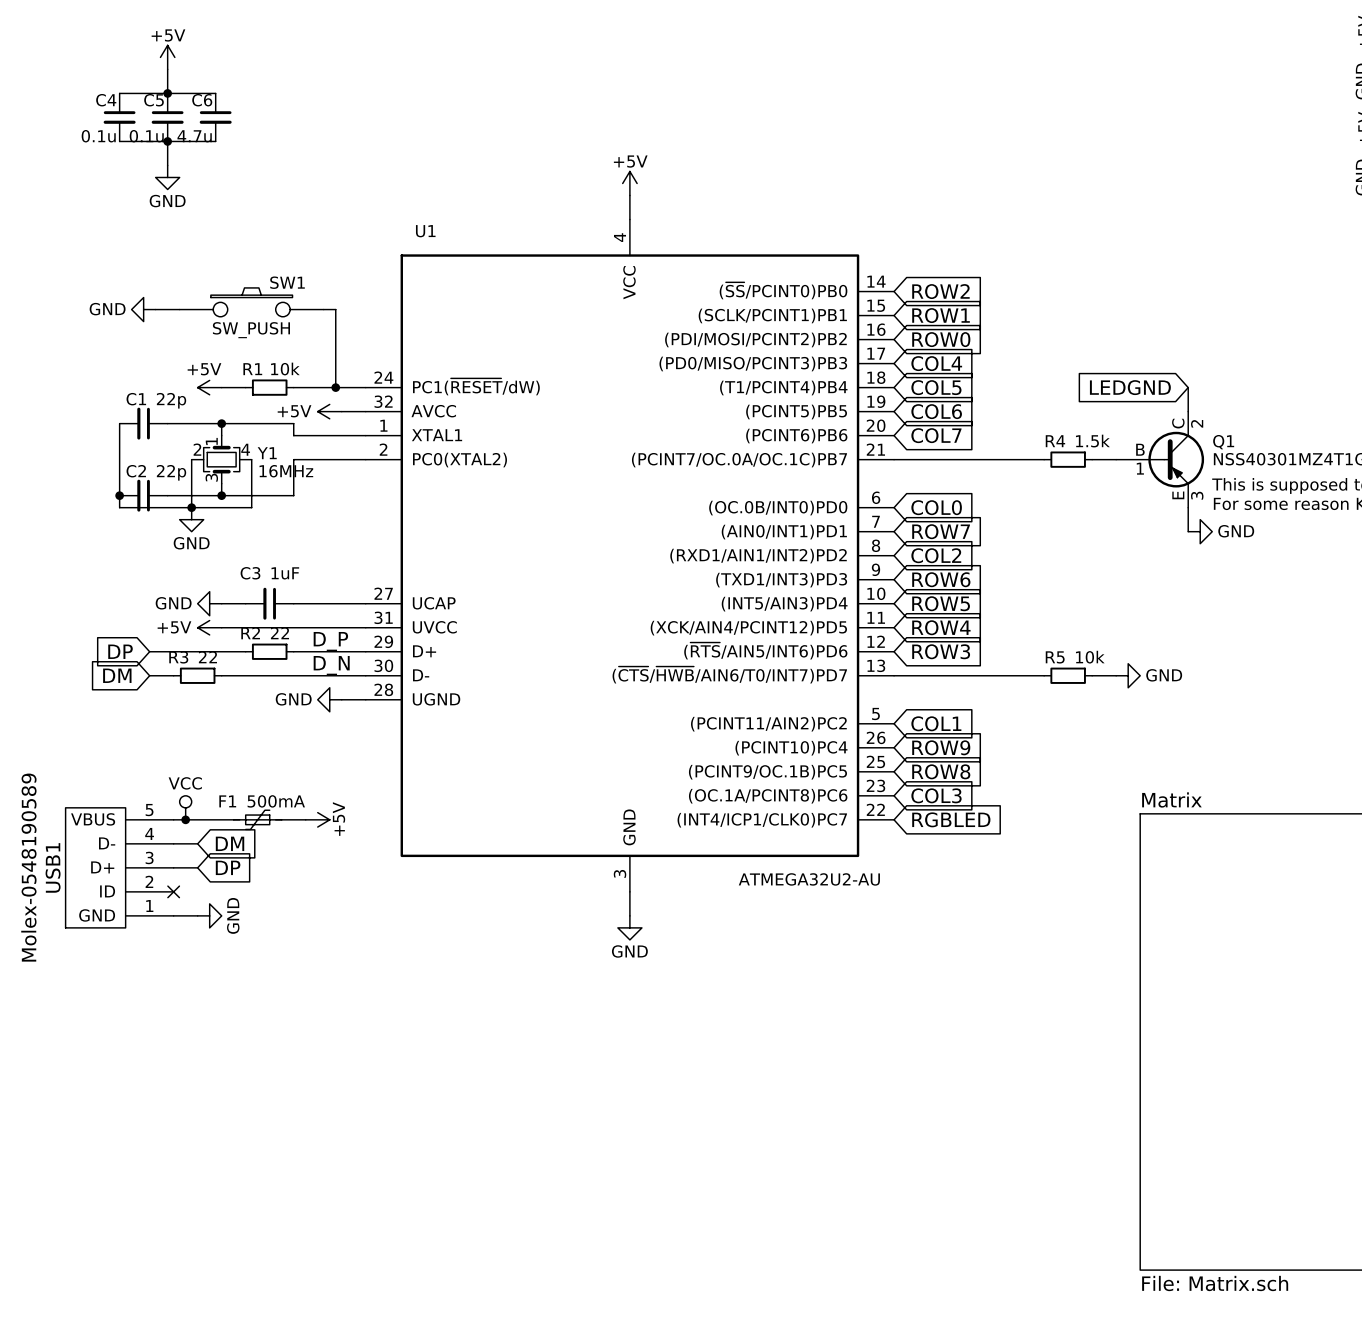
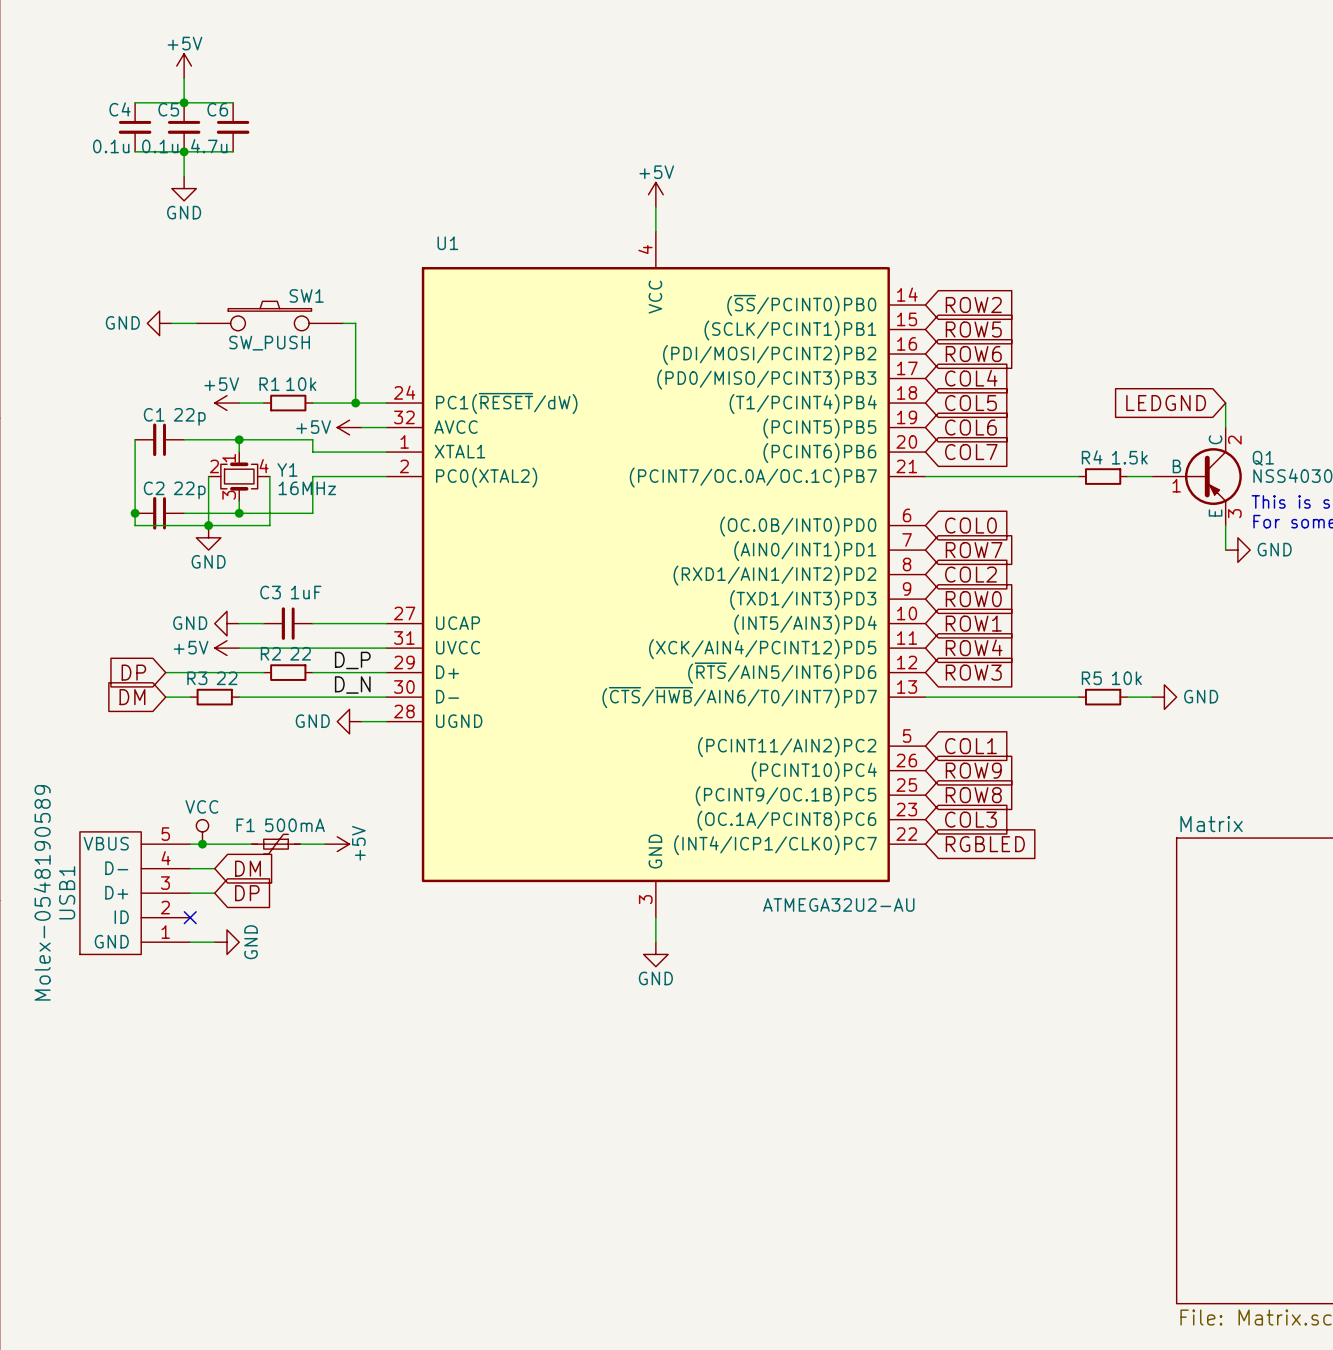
global label: ROW1 (941, 315) -> ROW5 (973, 329)
global label: ROW0 (941, 339) -> ROW6 (973, 354)
global label: ROW6 (941, 579) -> ROW0 (973, 599)
global label: ROW5 (941, 603) -> ROW1 (973, 623)

